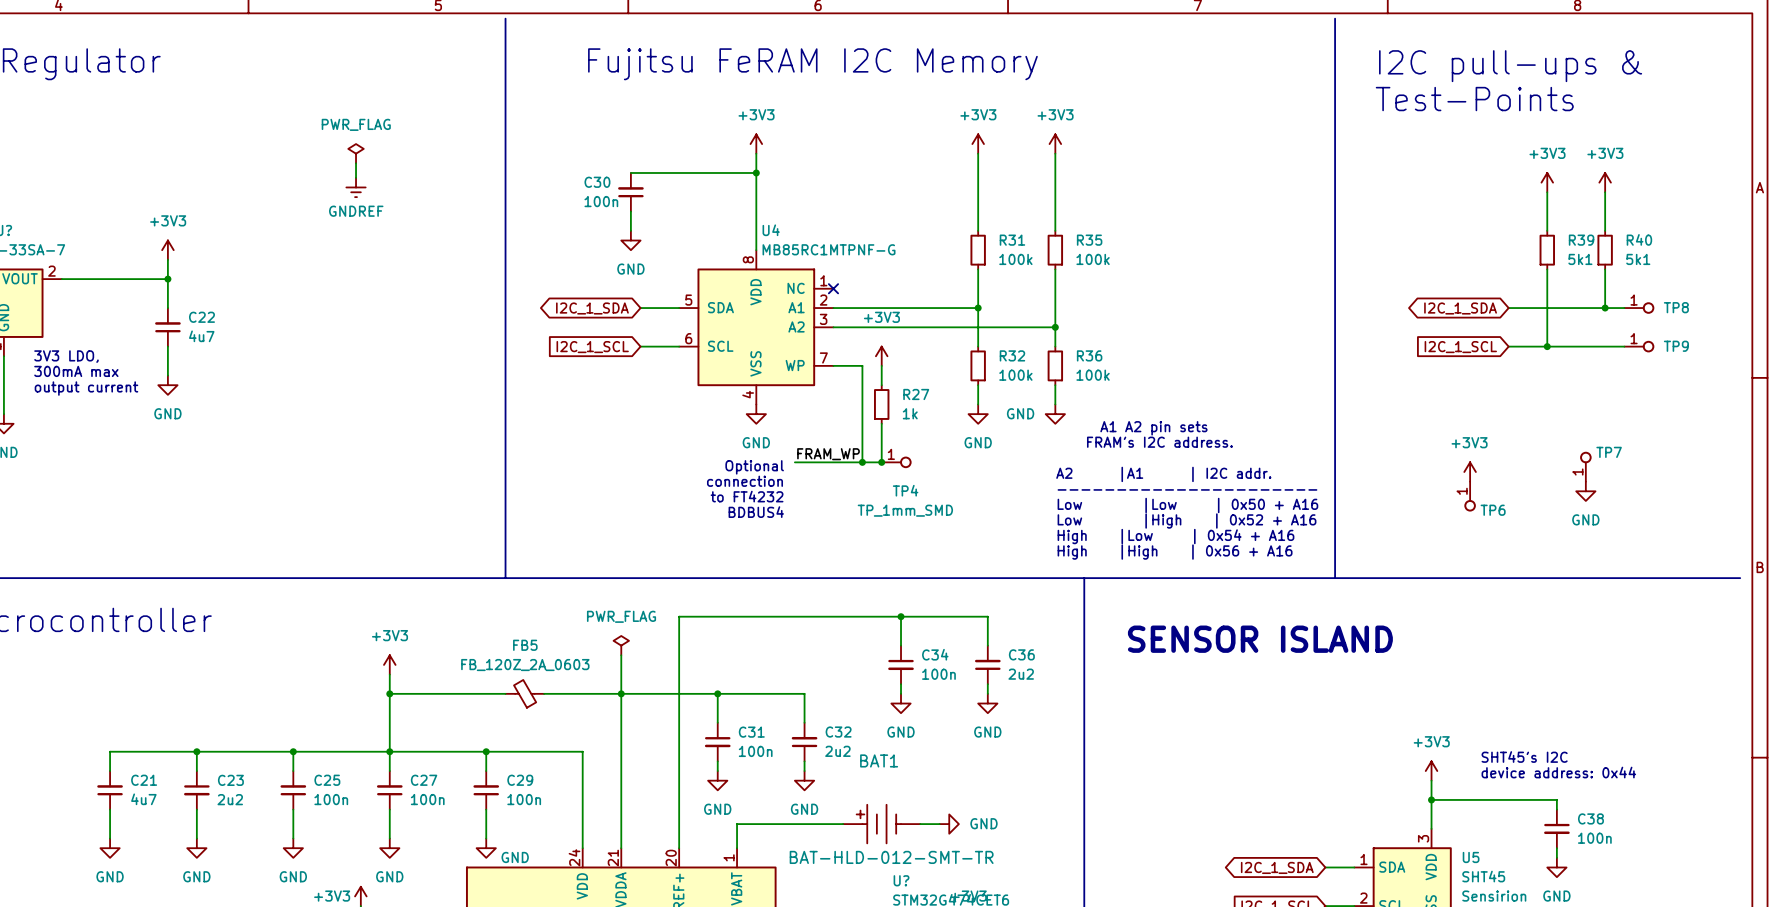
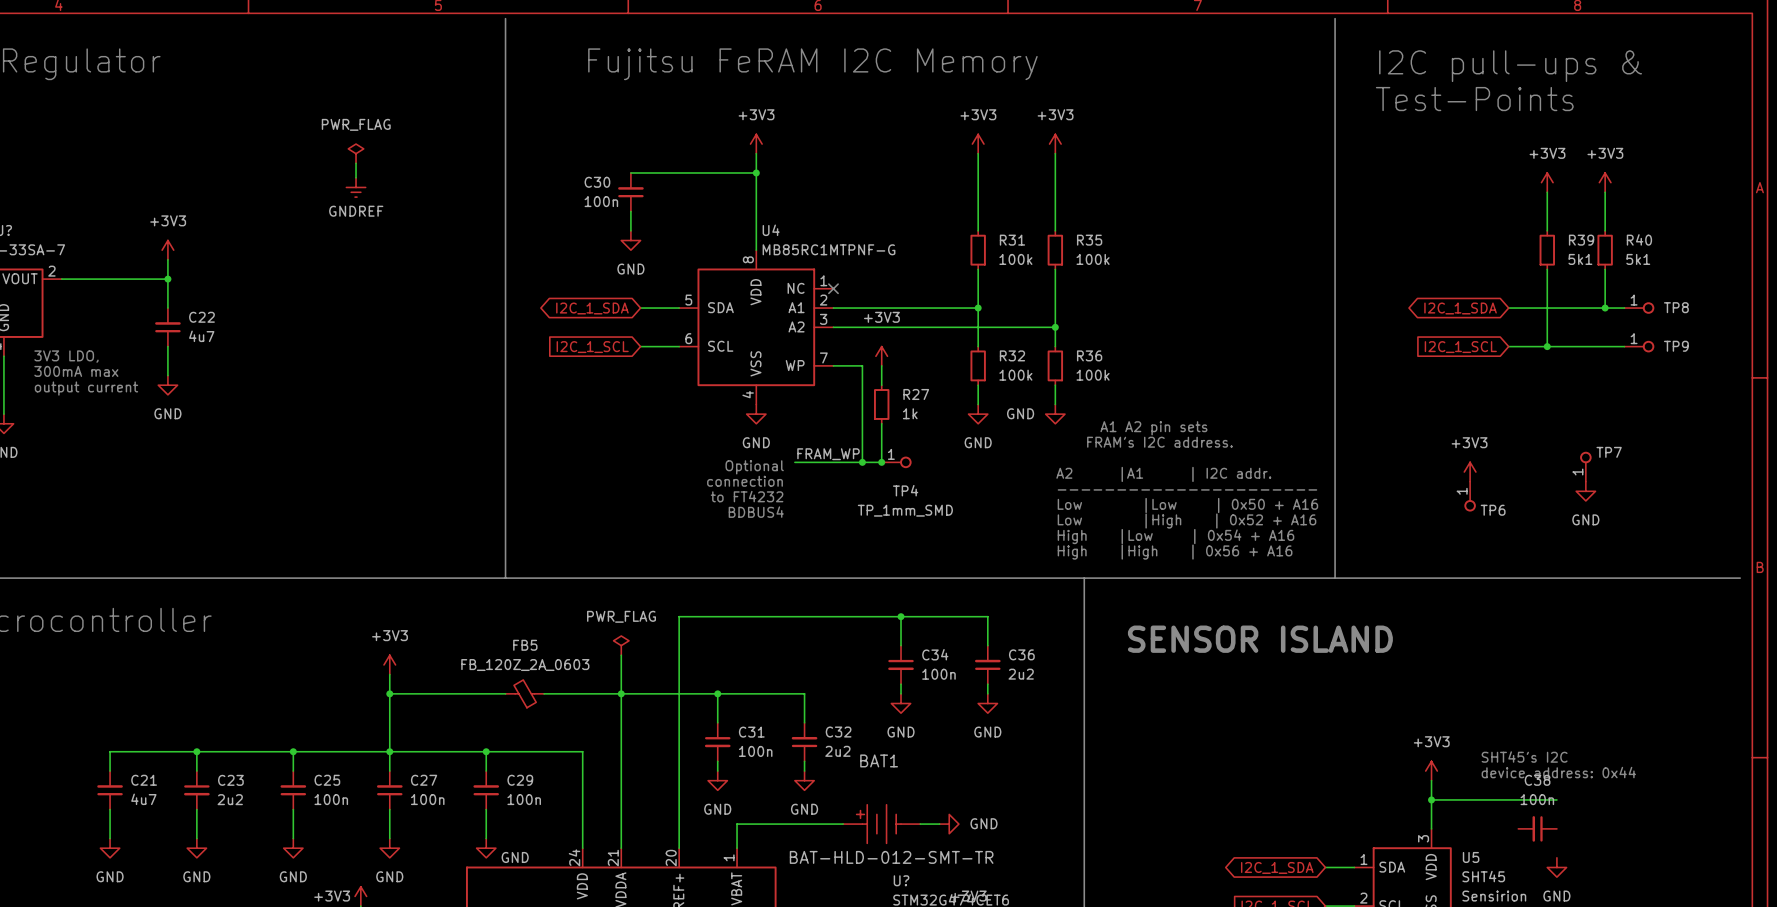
wire: (1556, 799) (1556, 809) -> none
C38 name position: C38 (1590, 818) -> C38 (1537, 780)
C38 rotation: 0° (1556, 828) -> 90° clockwise (1537, 828)
C38 text position: 100n (1594, 838) -> 100n (1537, 799)
wire: (1556, 848) (1556, 857) -> none

